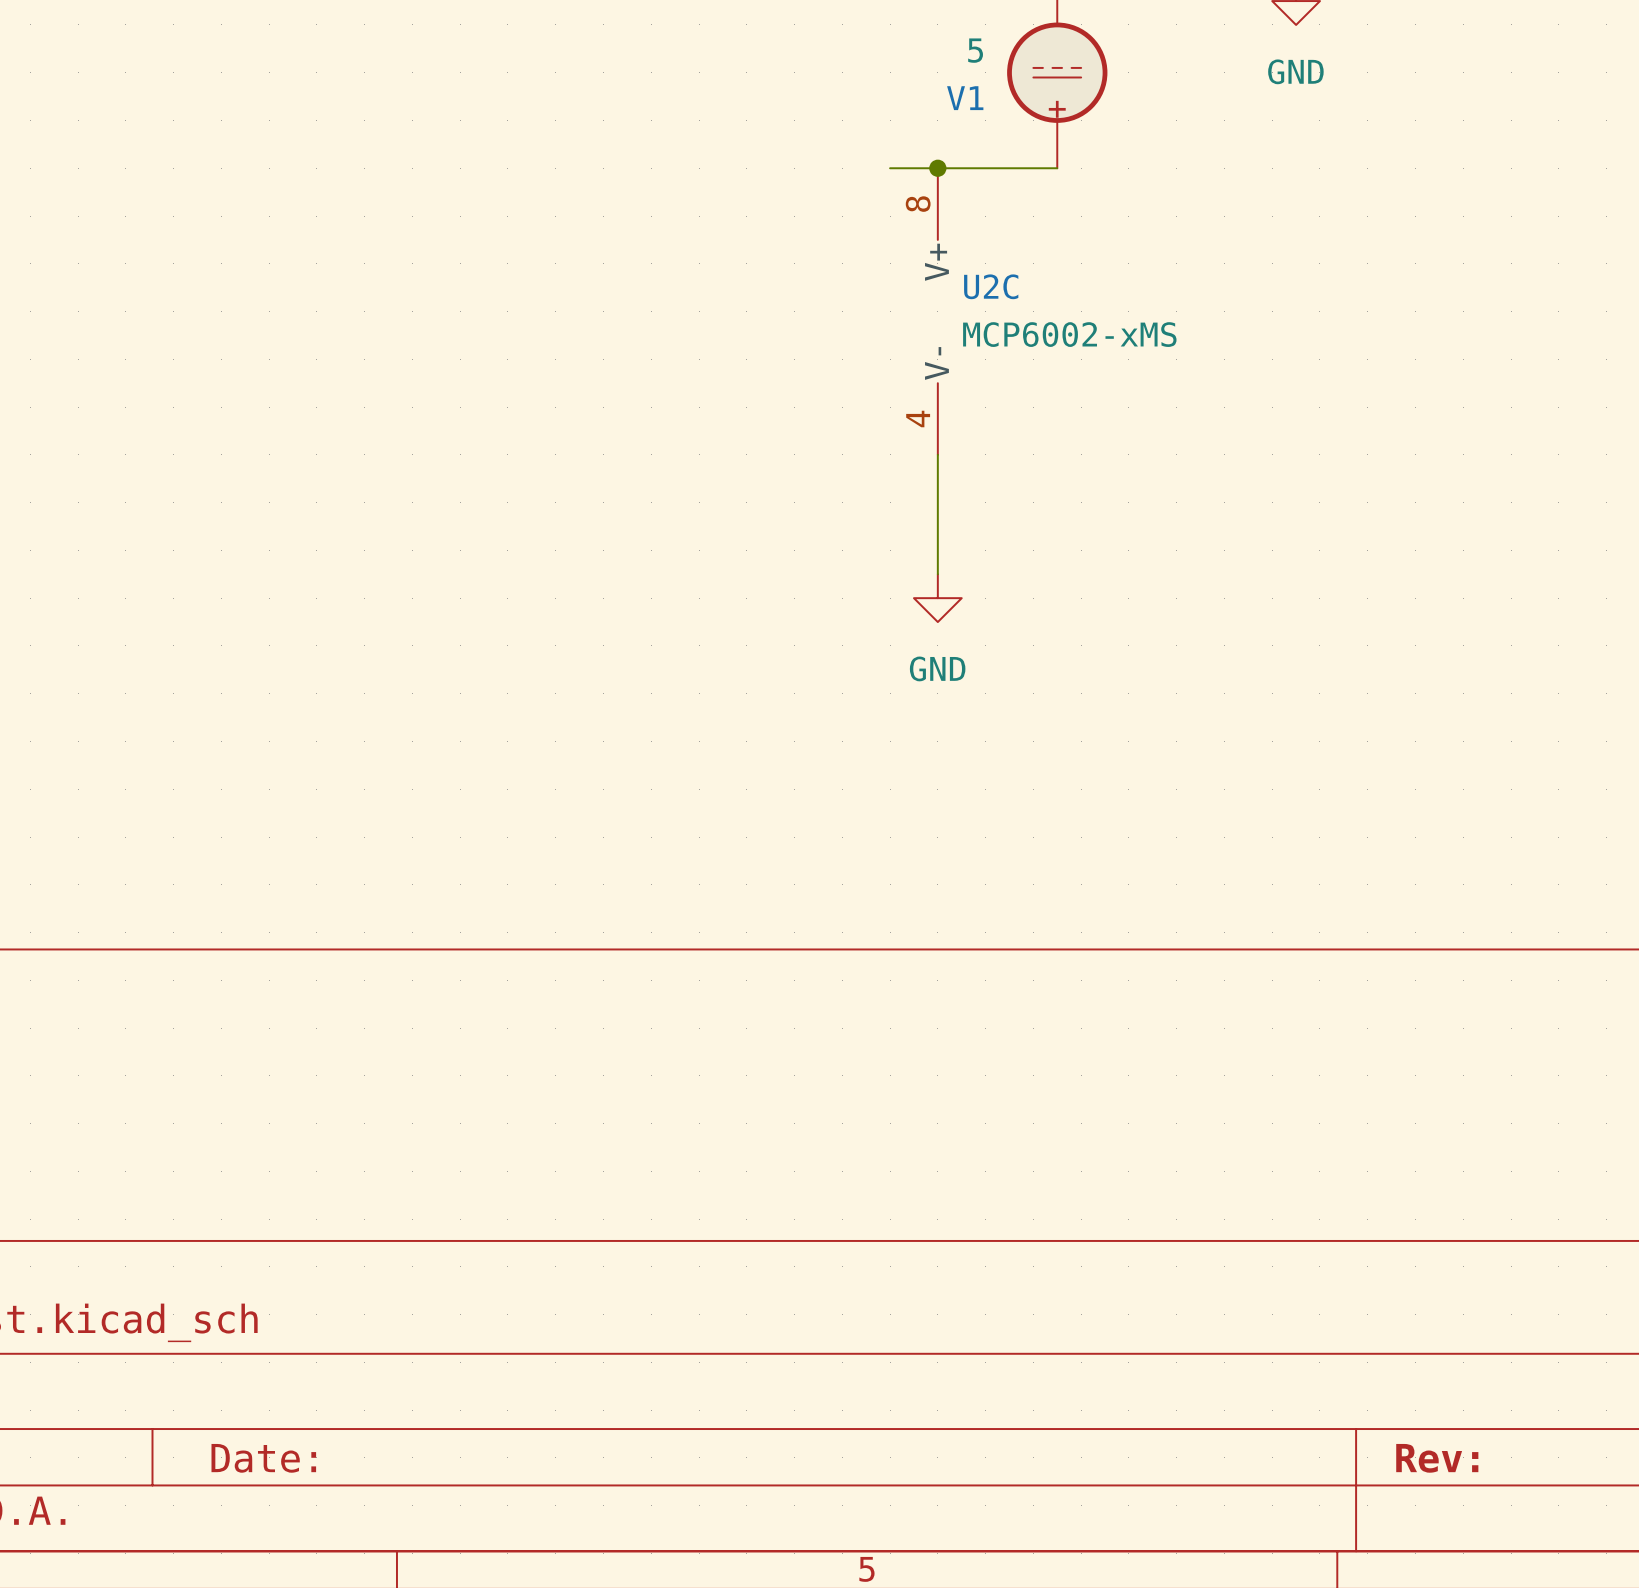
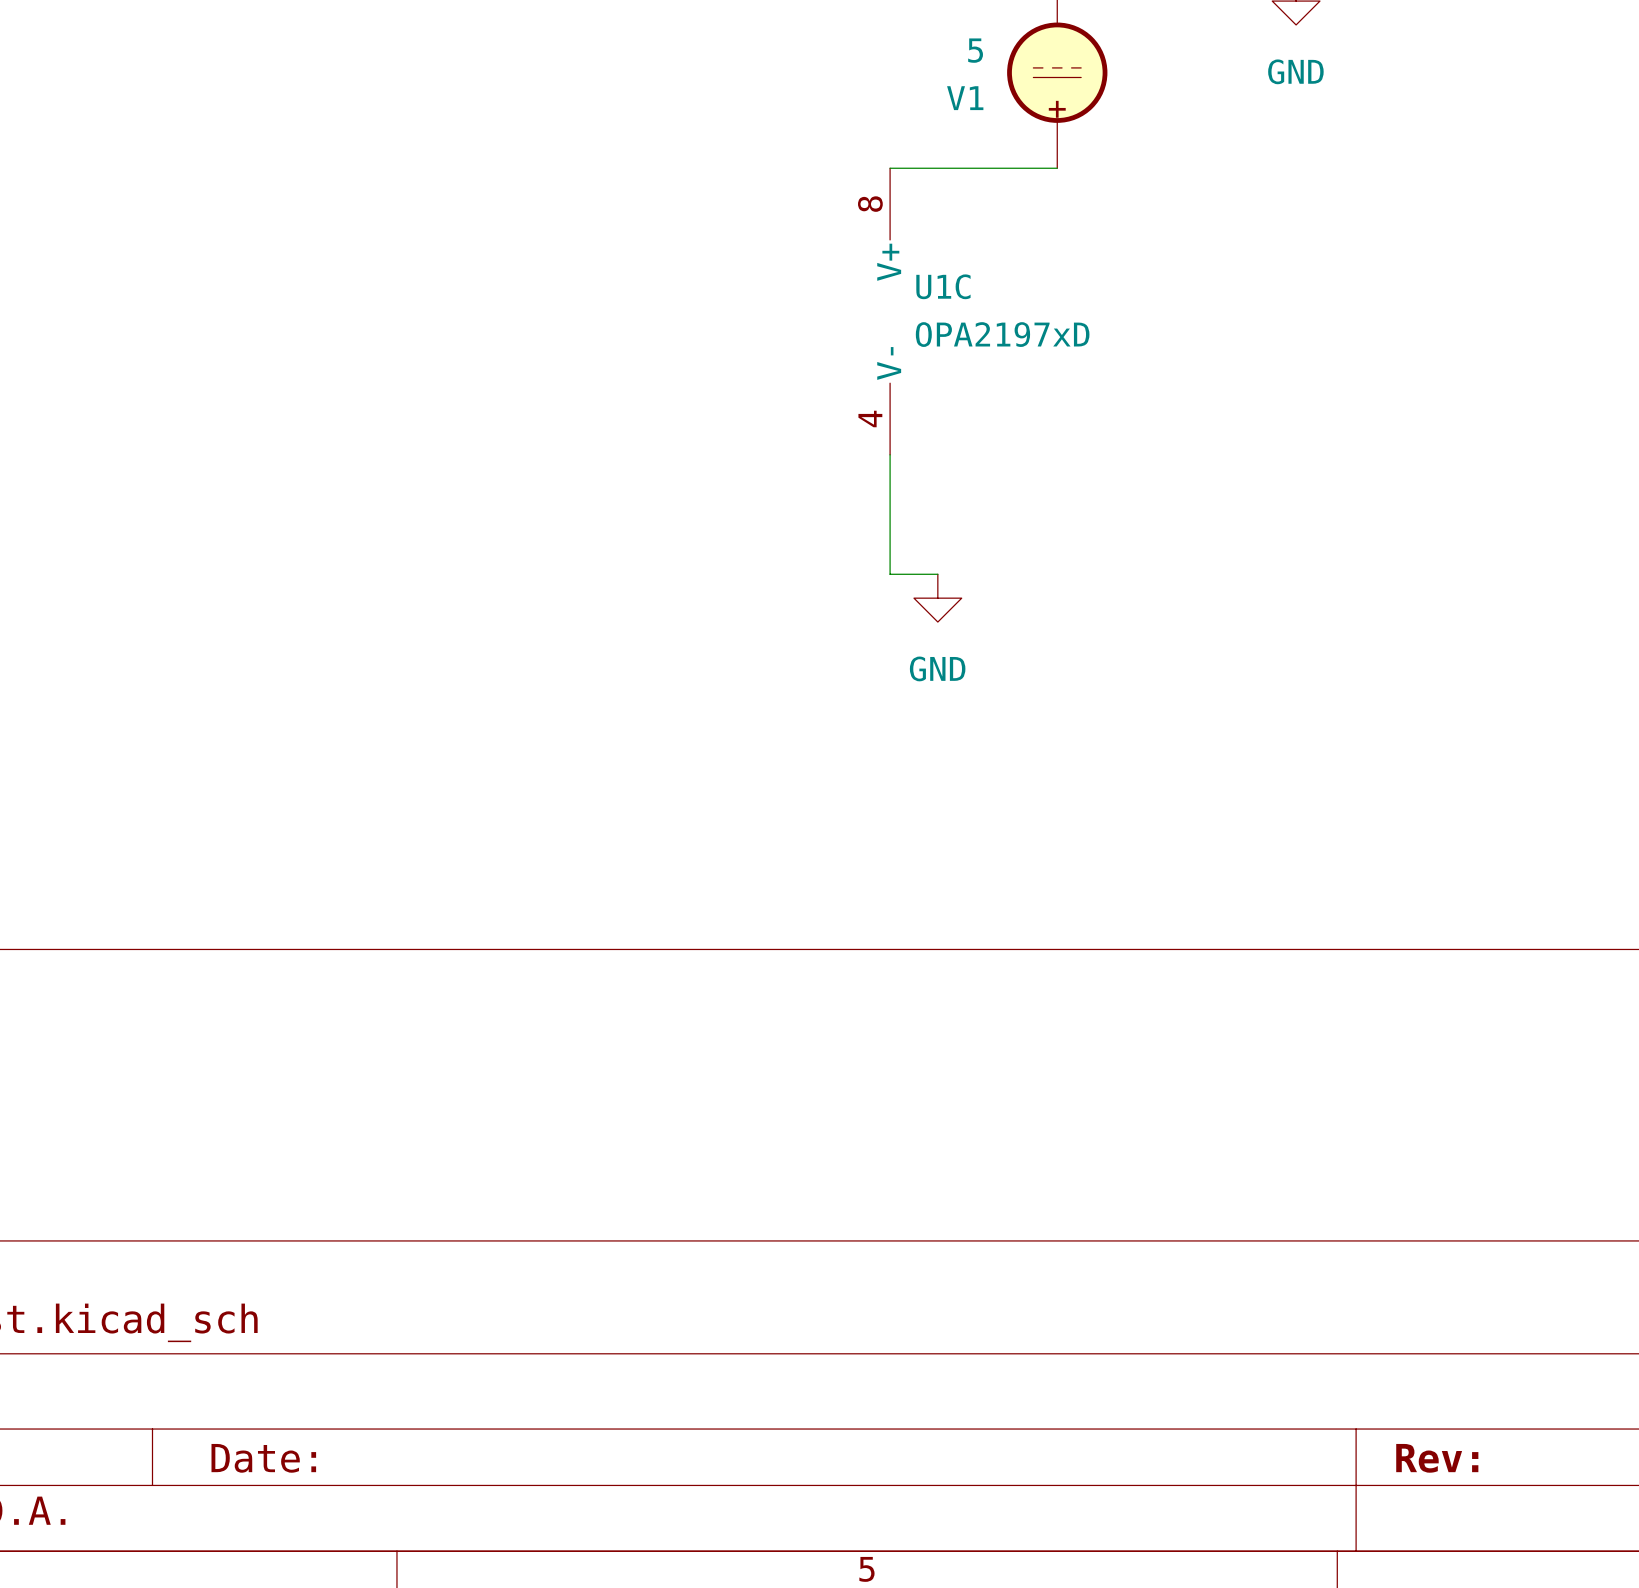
junction: (937, 168) -> none
U1C: none -> OPA2197xD (890, 311)
U2C: MCP6002-xMS (937, 311) -> none
wire: (937, 454) (937, 574) -> (890, 454) (890, 574) (937, 574)

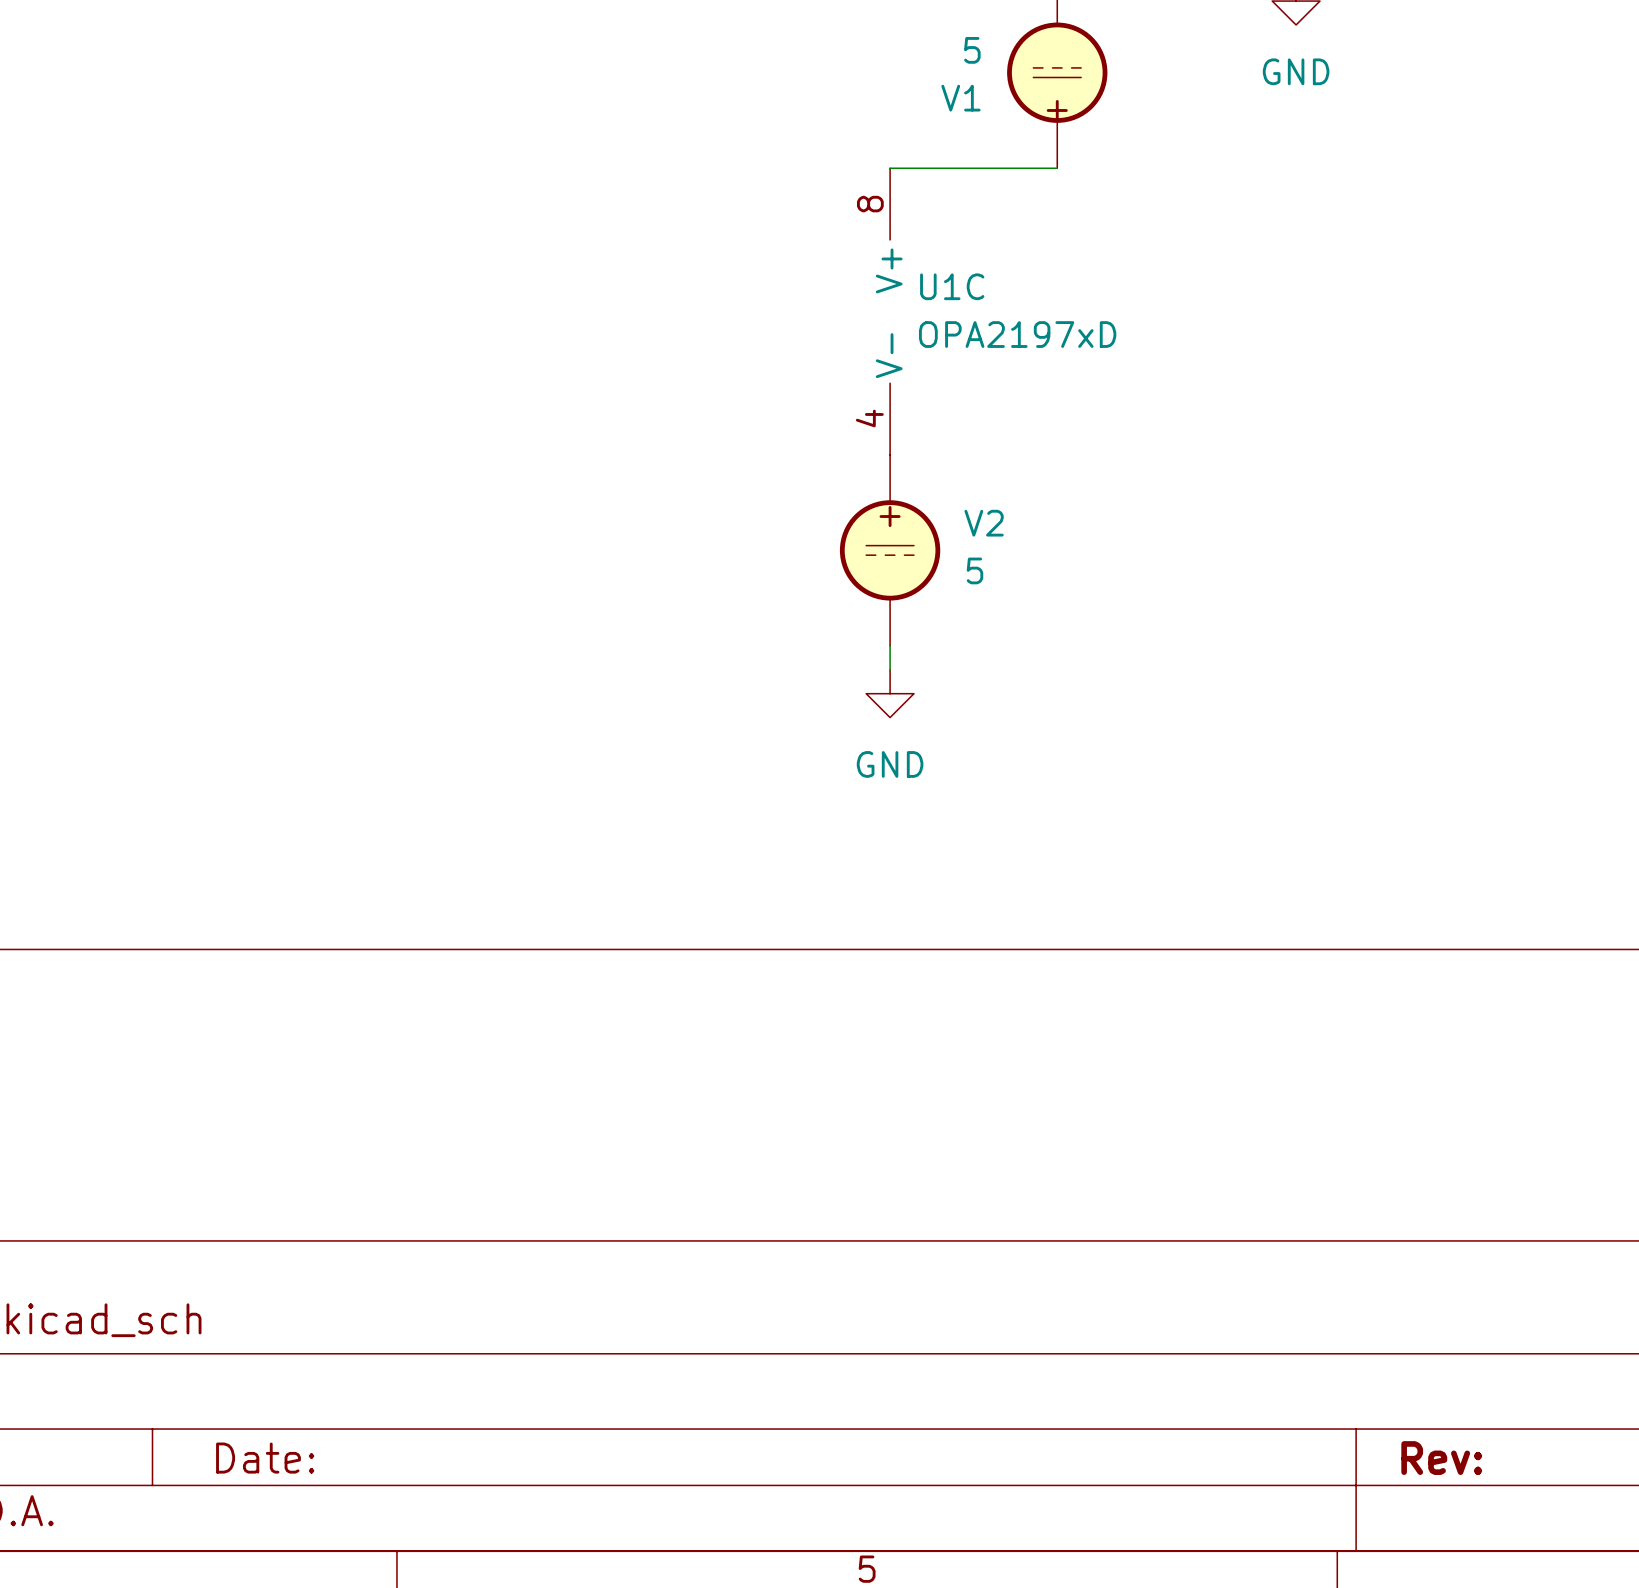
V2: none -> 5 (890, 550)
power symbol position: GND (937, 598) -> GND (890, 693)
wire: none -> (890, 645) (890, 669)

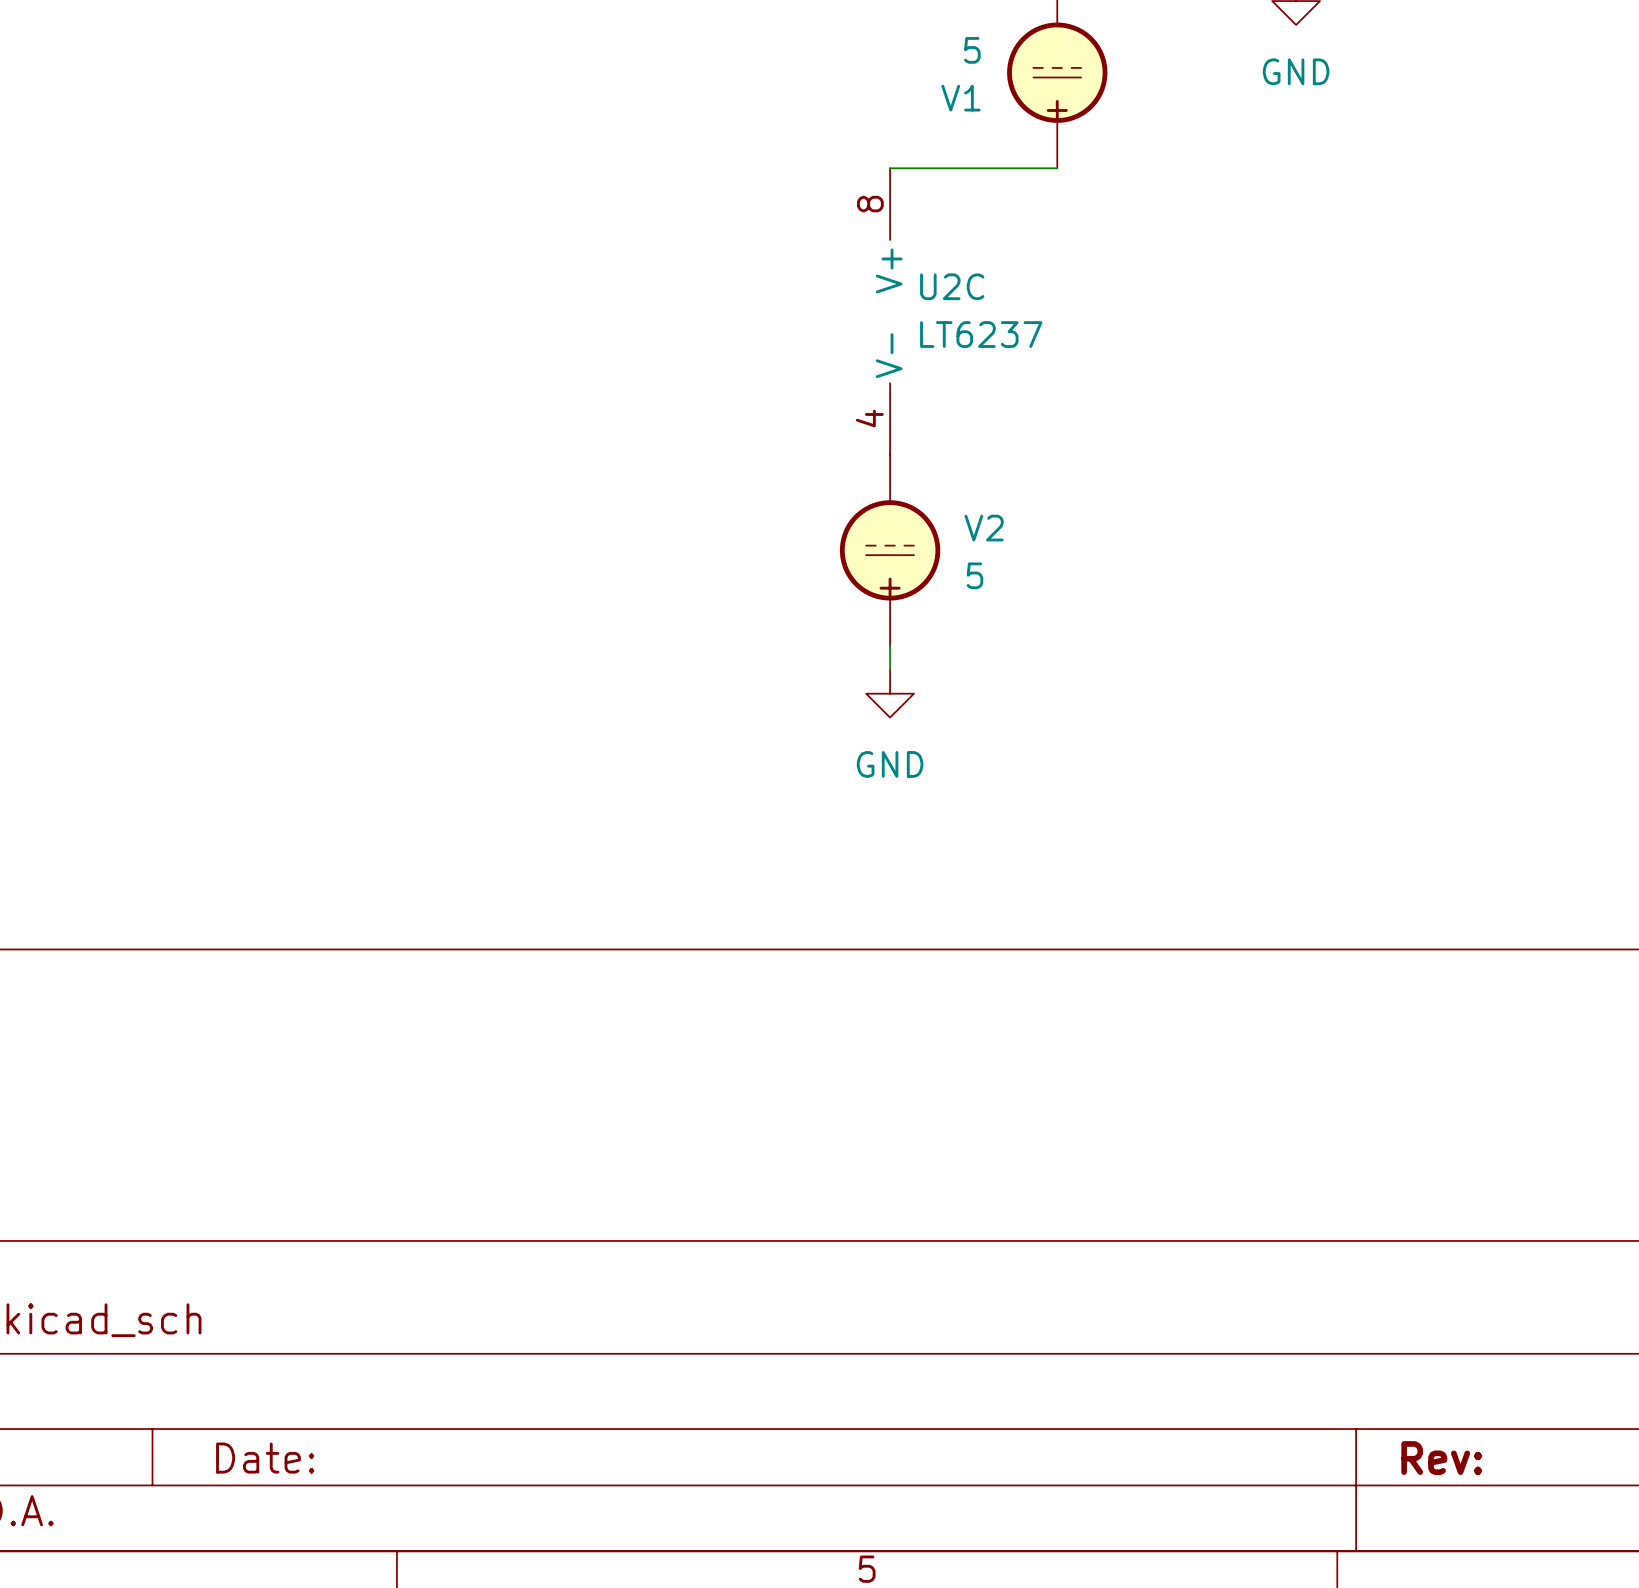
U1C name: U1C (952, 286) -> U2C (952, 286)
U1C value: OPA2197xD (1017, 334) -> LT6237 (981, 334)
V2 rotation: 0° (890, 550) -> 180° (890, 550)

